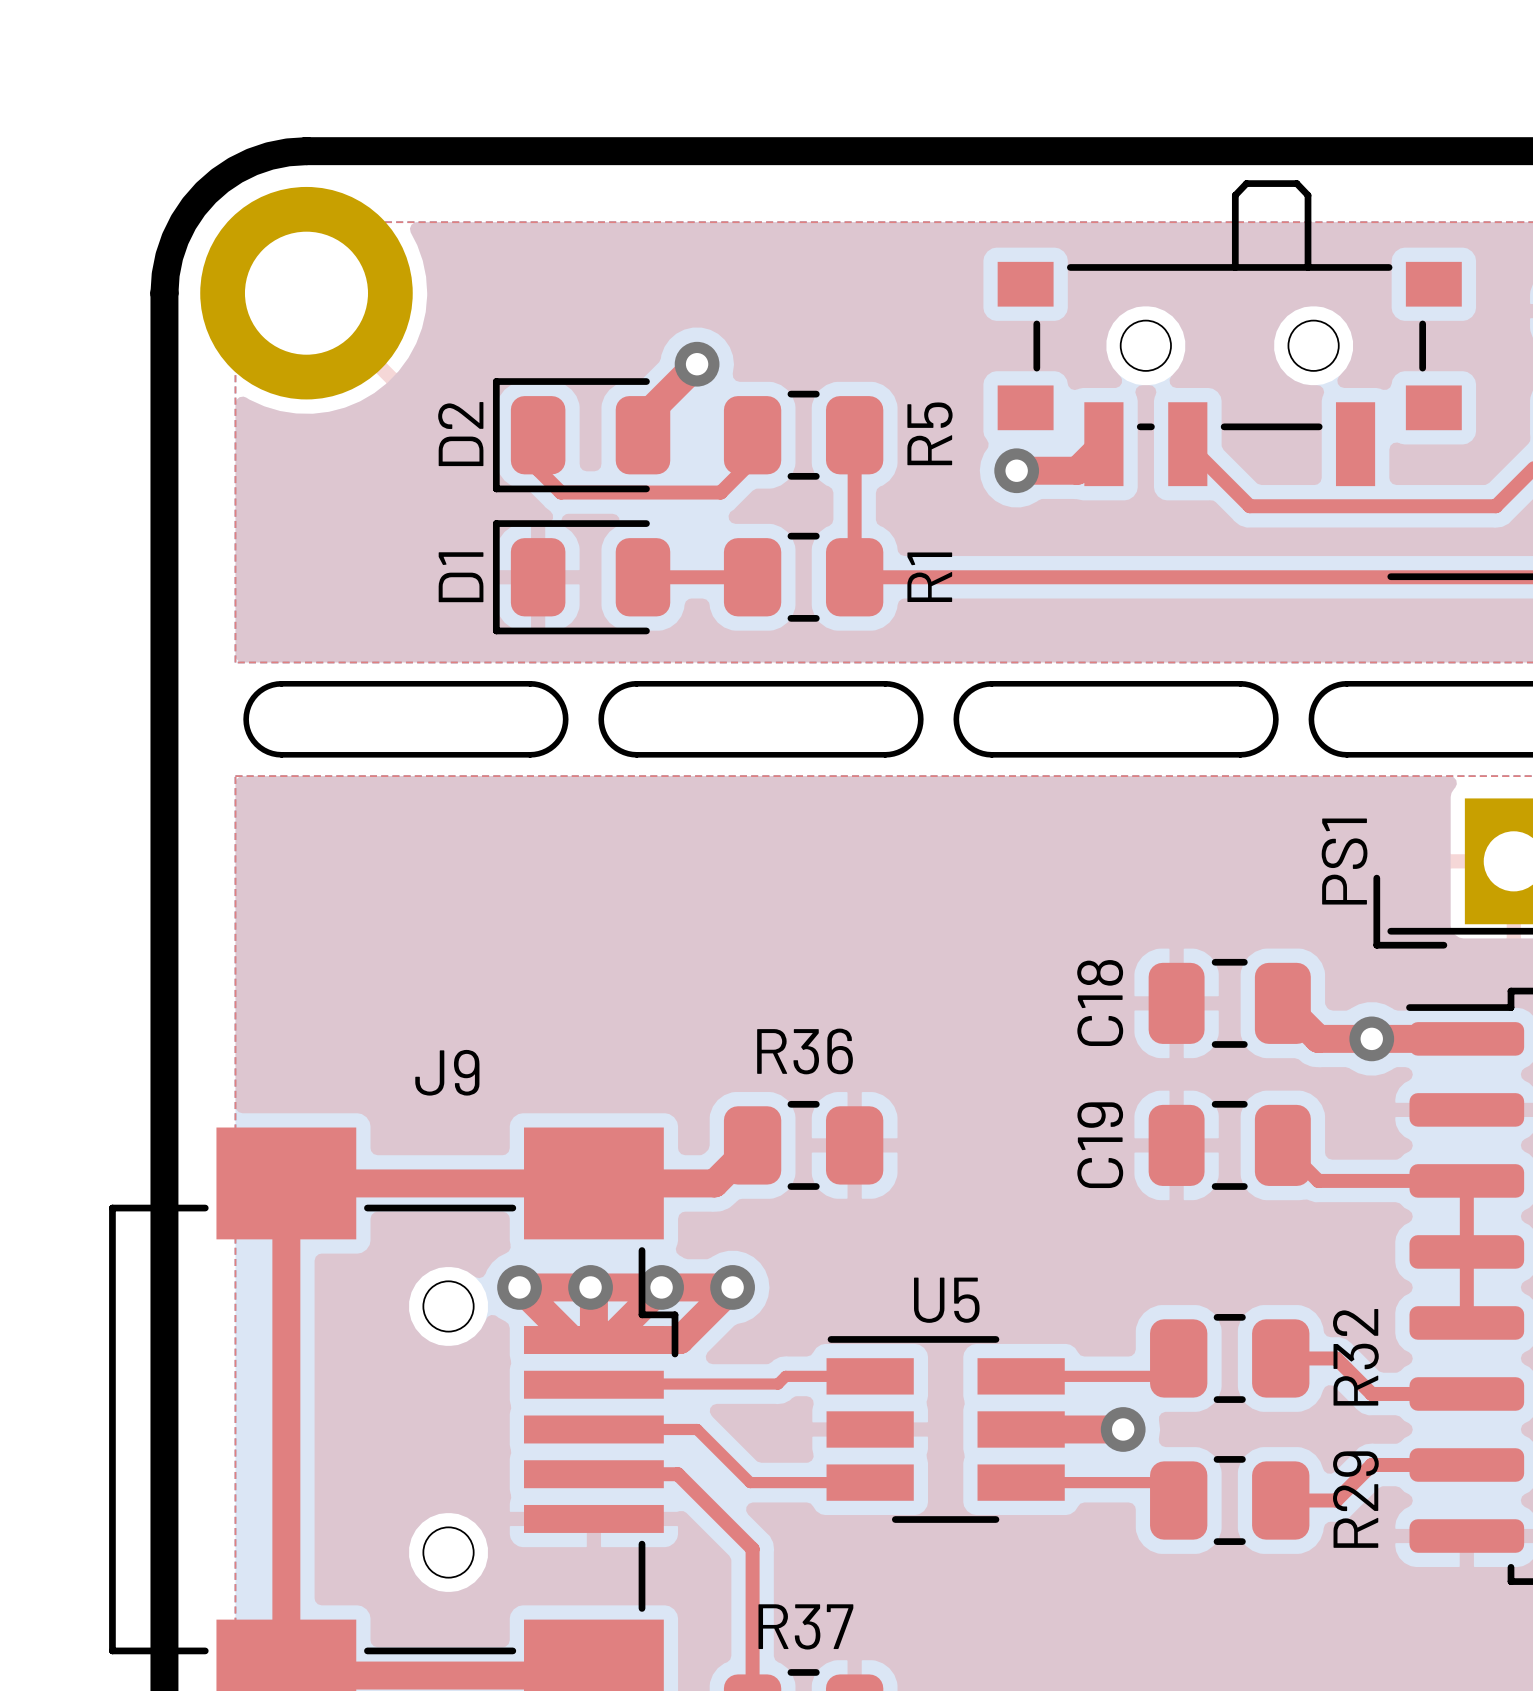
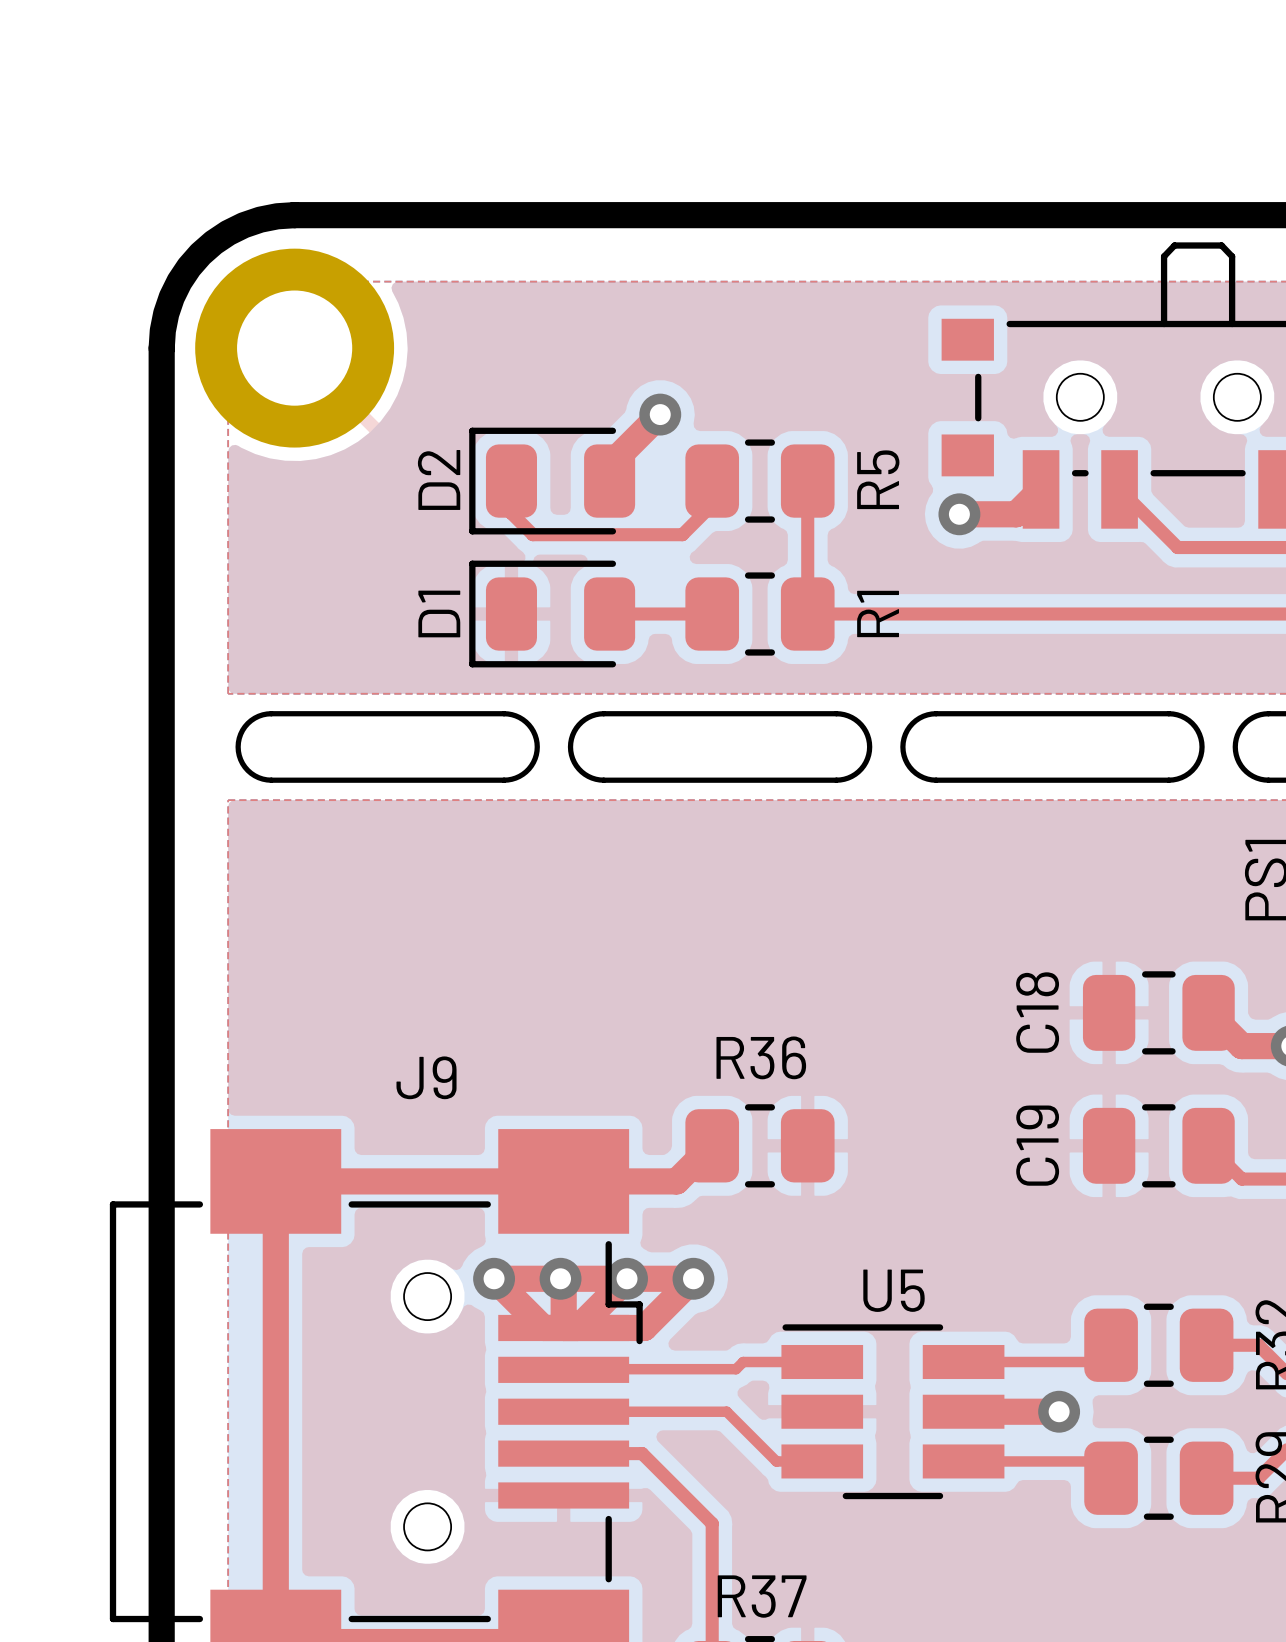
top track: (697, 1429) (750, 1482) (821, 1482) -> (660, 1411) (726, 1411) (776, 1461)

